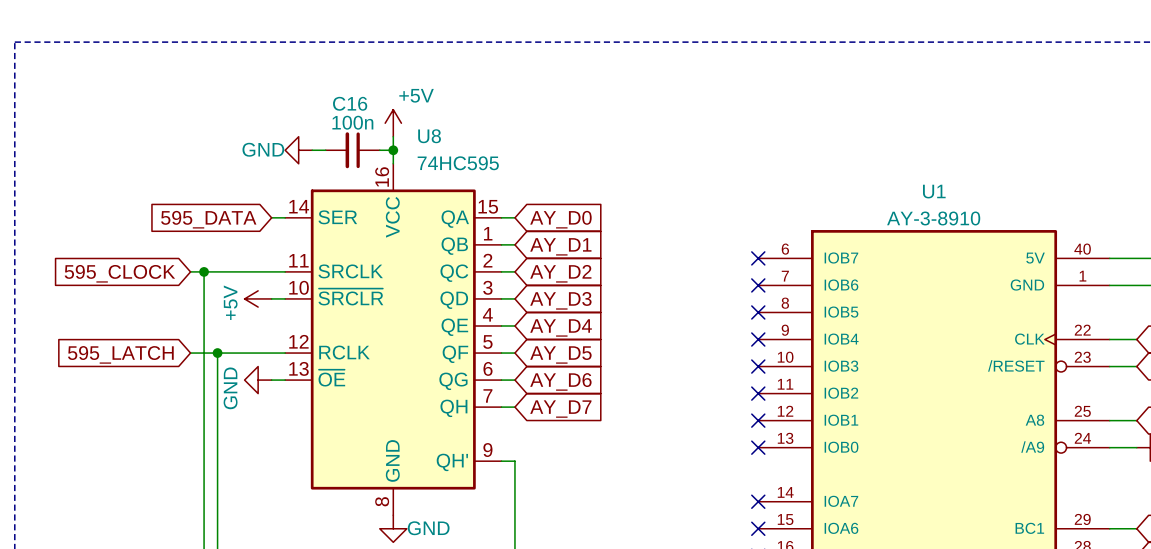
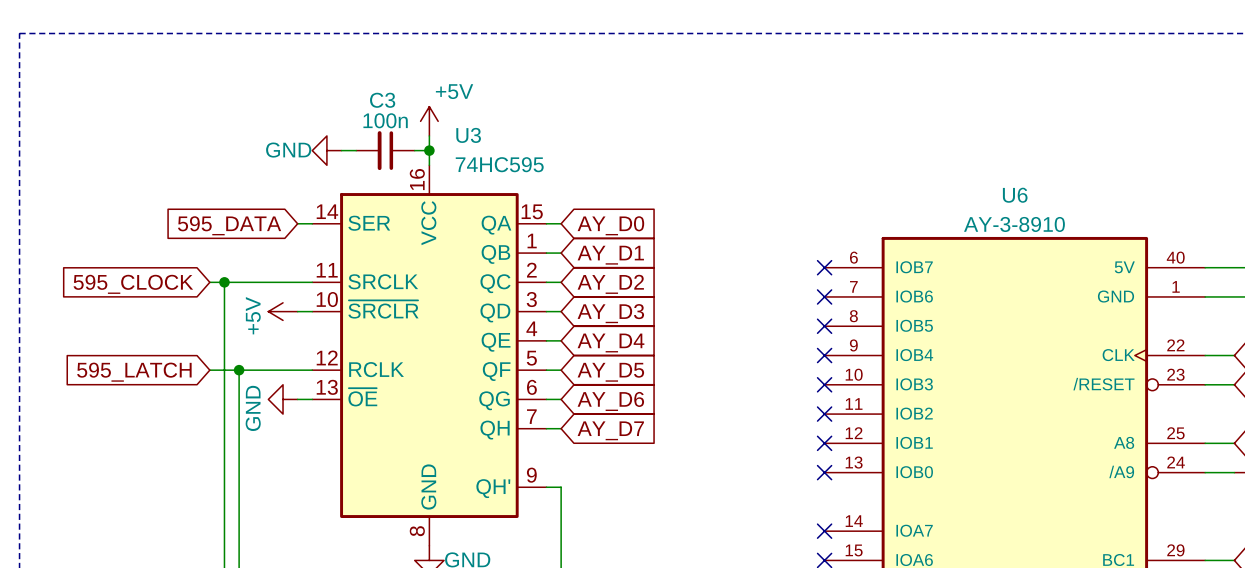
C16 name: C16 (350, 103) -> C3 (382, 100)
U8 name: U8 (429, 136) -> U3 (468, 135)
U1 name: U1 (934, 191) -> U6 (1015, 195)

